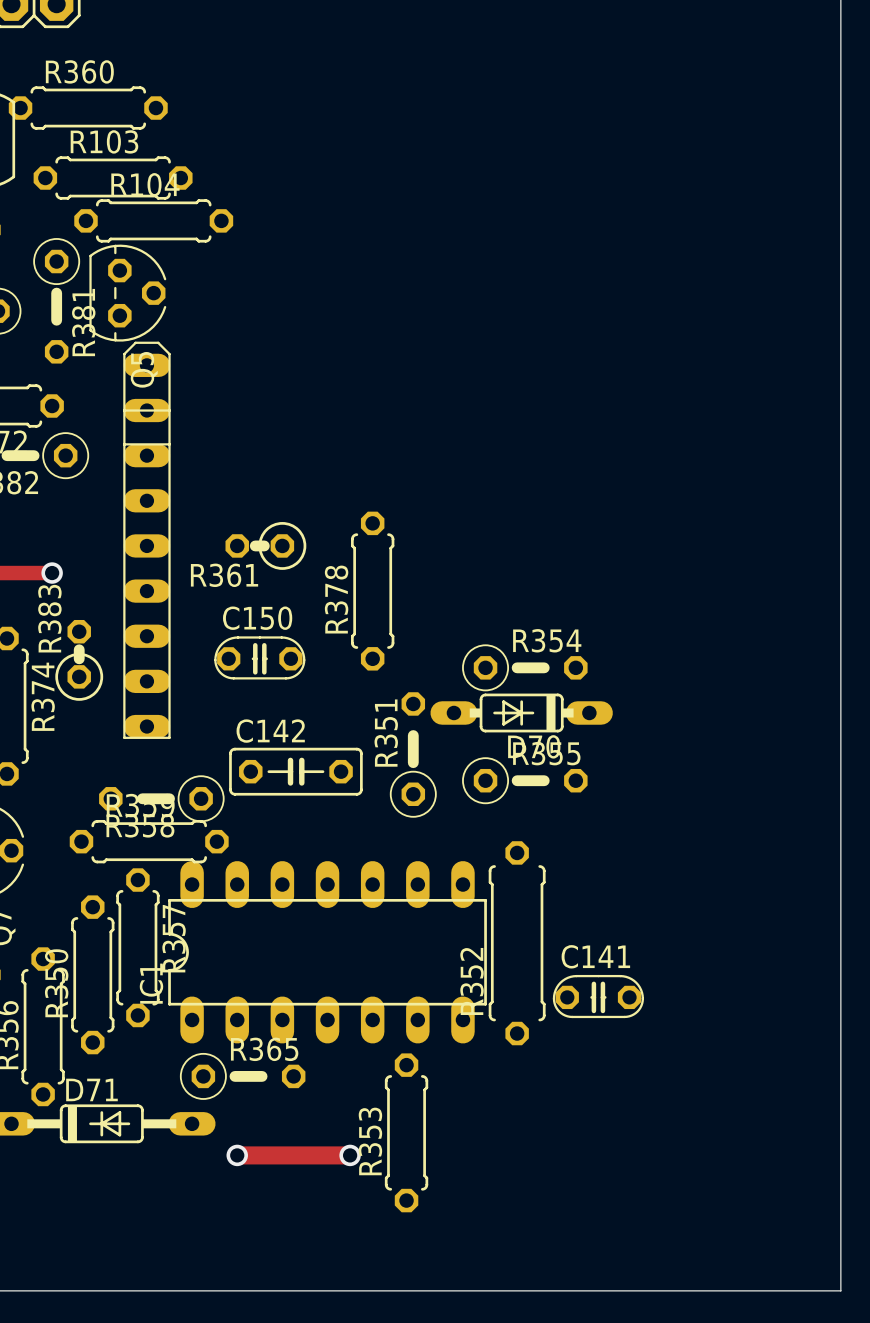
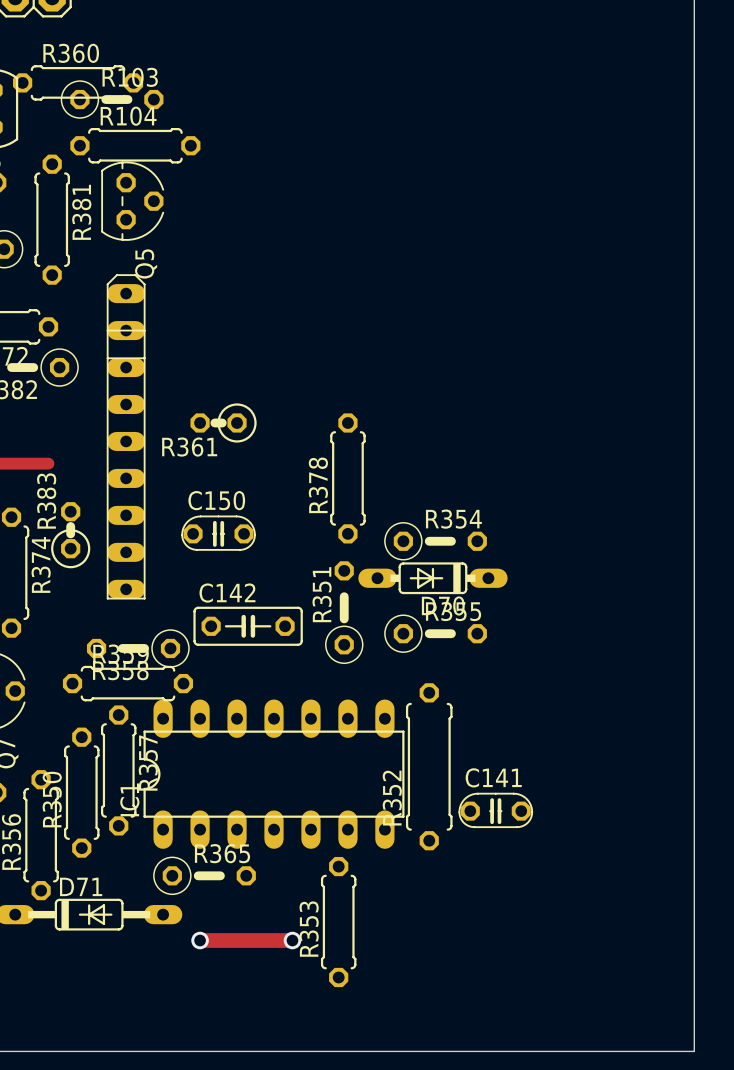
R103 footprint: [33, 156, 193, 200] -> [60, 80, 164, 119]
R104 position: (153, 220) -> (135, 145)
R381 footprint: [33, 238, 81, 364] -> [34, 154, 70, 285]
Q5 position: (127, 293) -> (132, 201)
R361 position: (265, 545) -> (223, 422)
via: (52, 573) -> none
R378 position: (372, 591) -> (347, 478)

